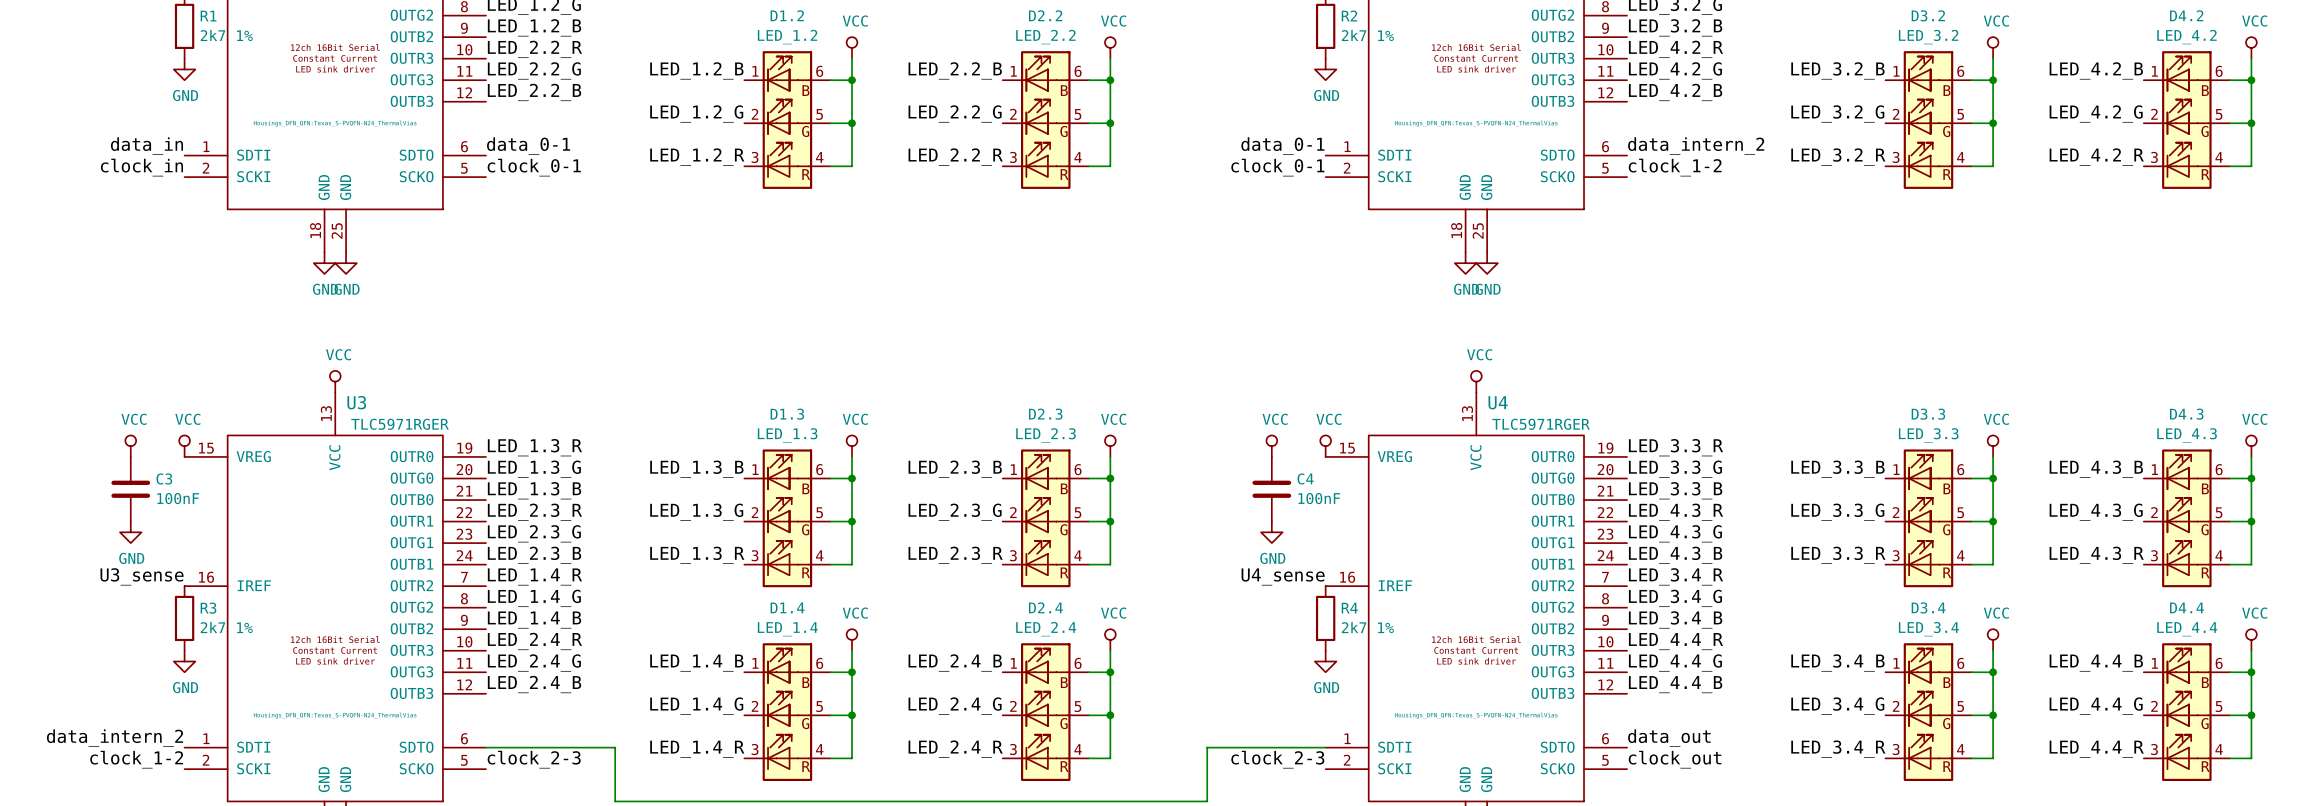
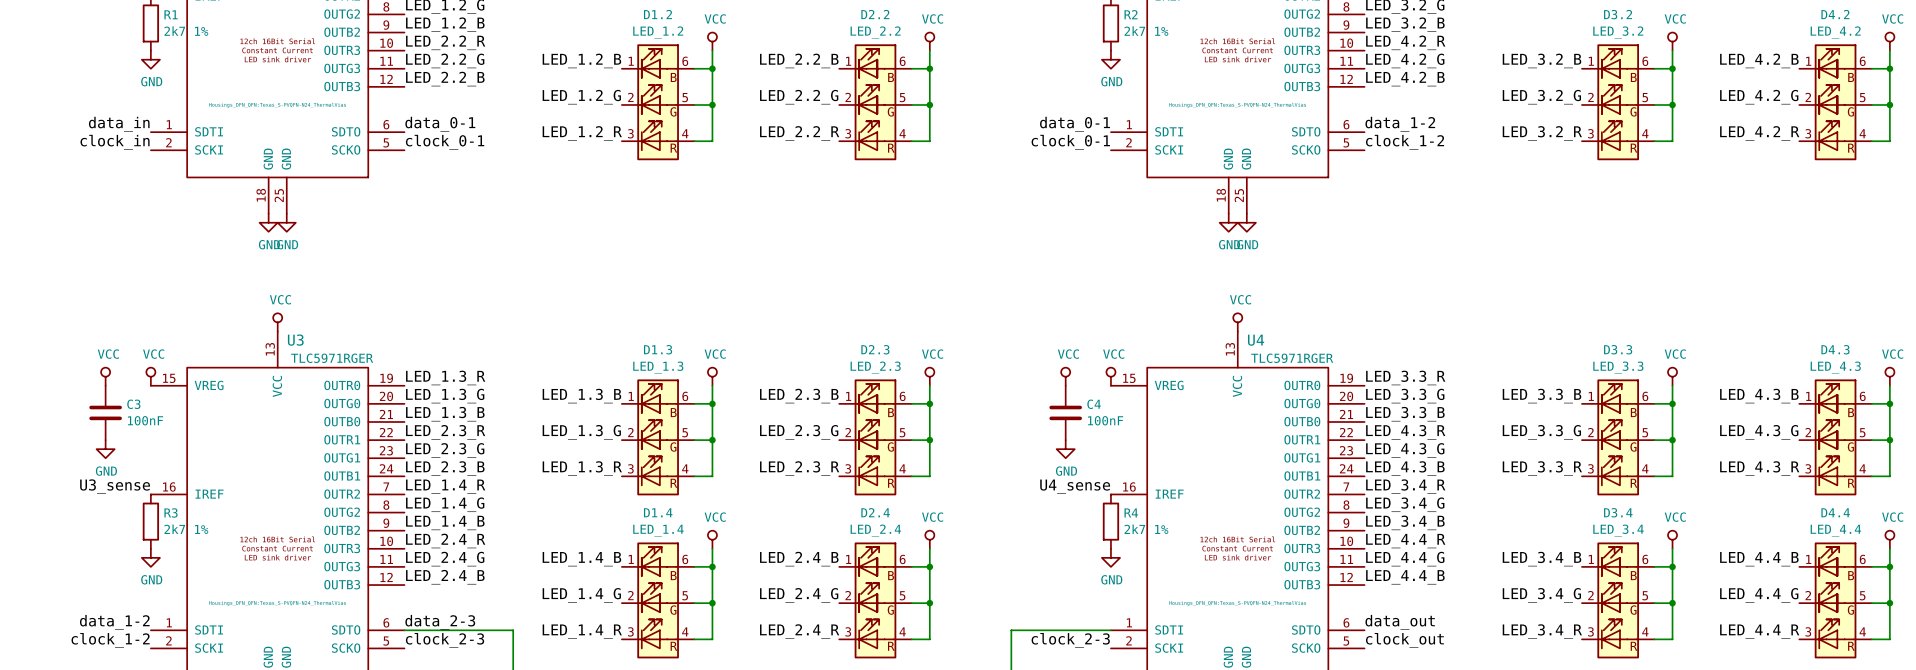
label: data_intern_2 (1696, 146) -> data_1-2 (1400, 124)
label: data_intern_2 (115, 738) -> data_1-2 (114, 622)
label: none -> data_2-3 (440, 622)

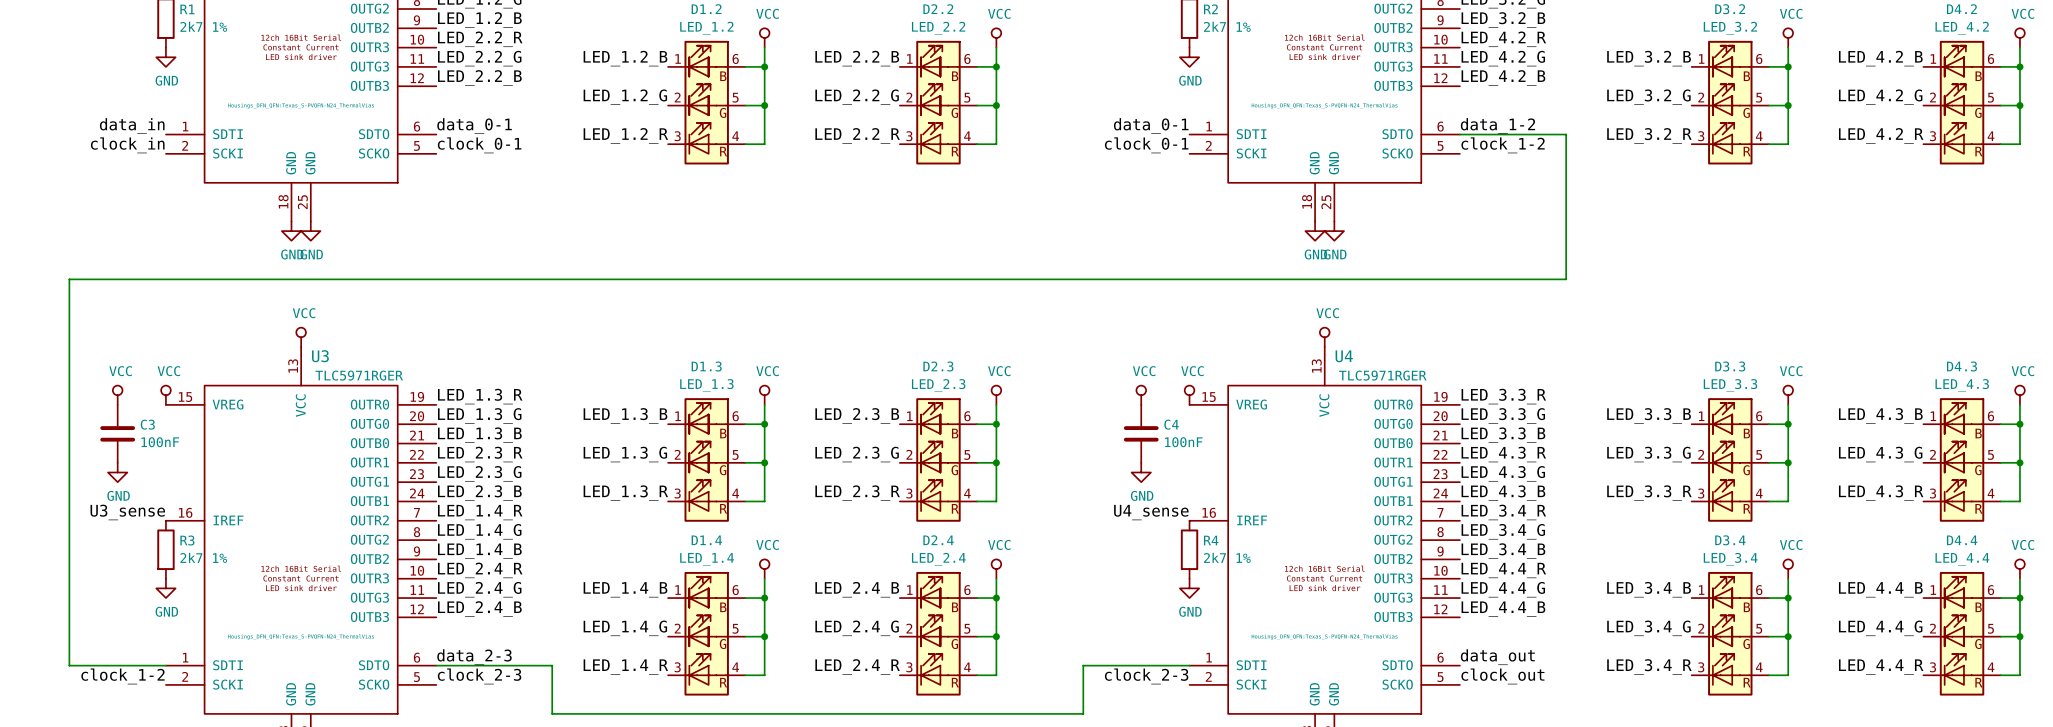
wire: none -> (1459, 134) (1566, 134) (1566, 279) (69, 279) (69, 665) (165, 665)
label: data_1-2 (114, 622) -> none

